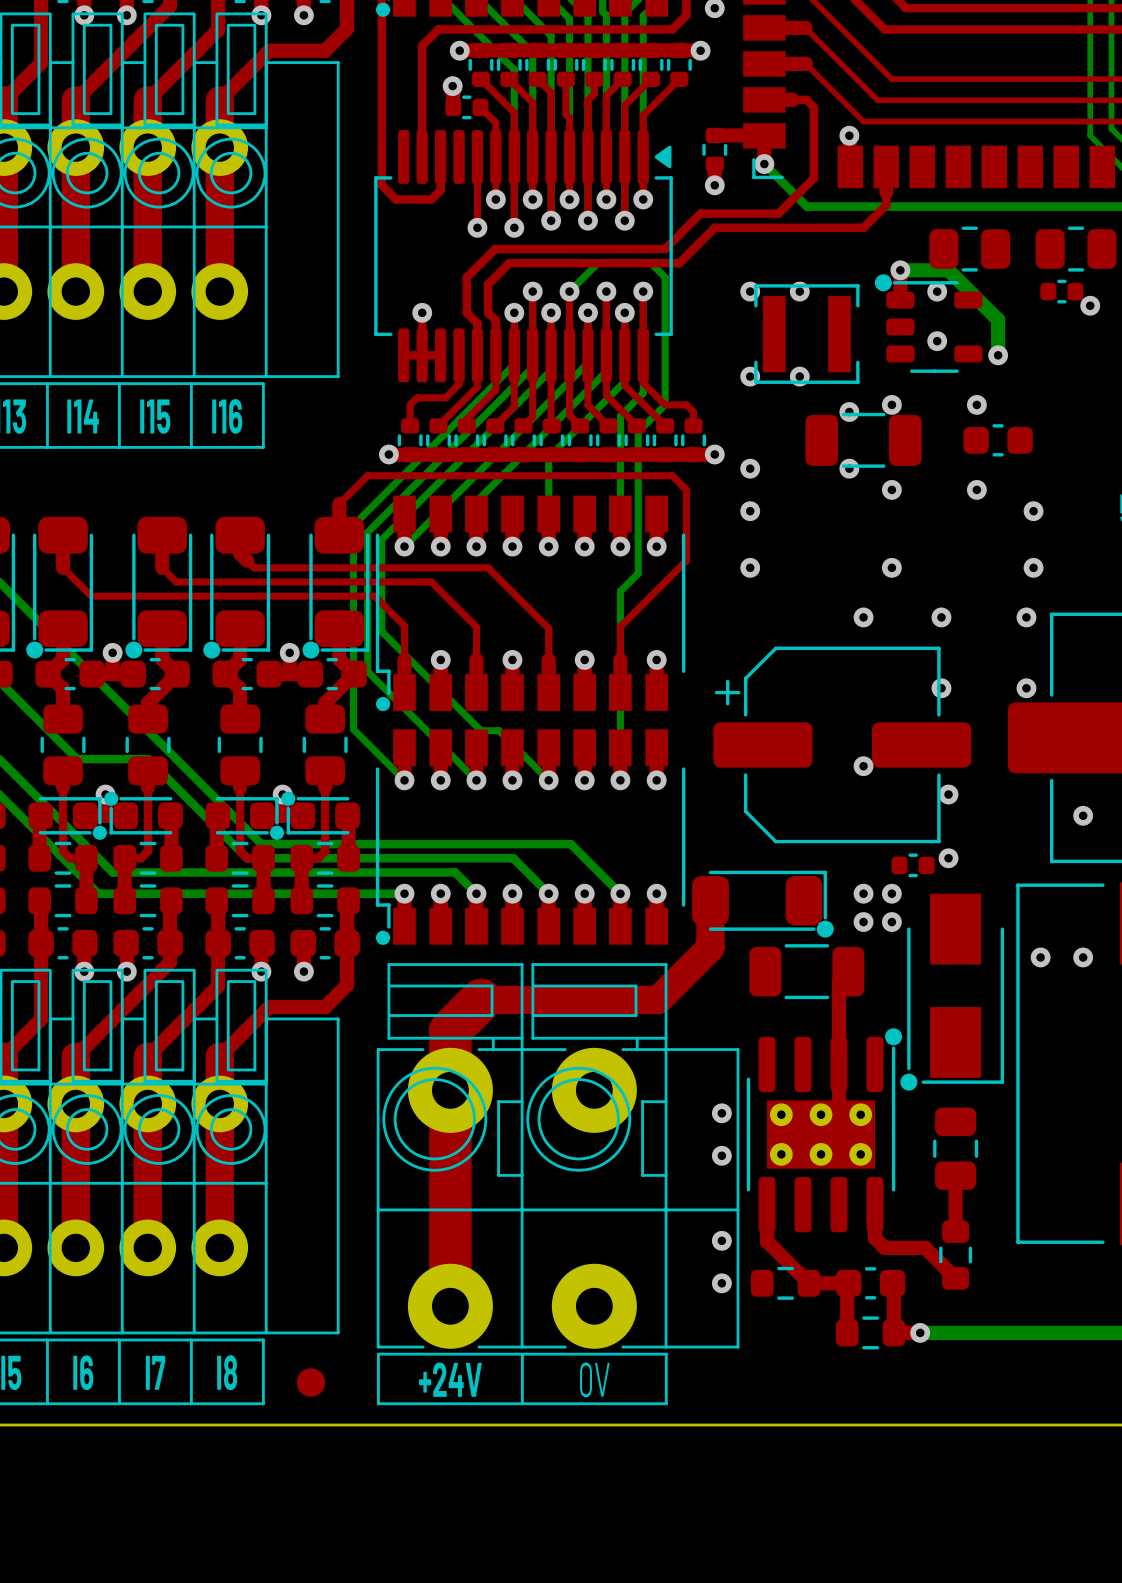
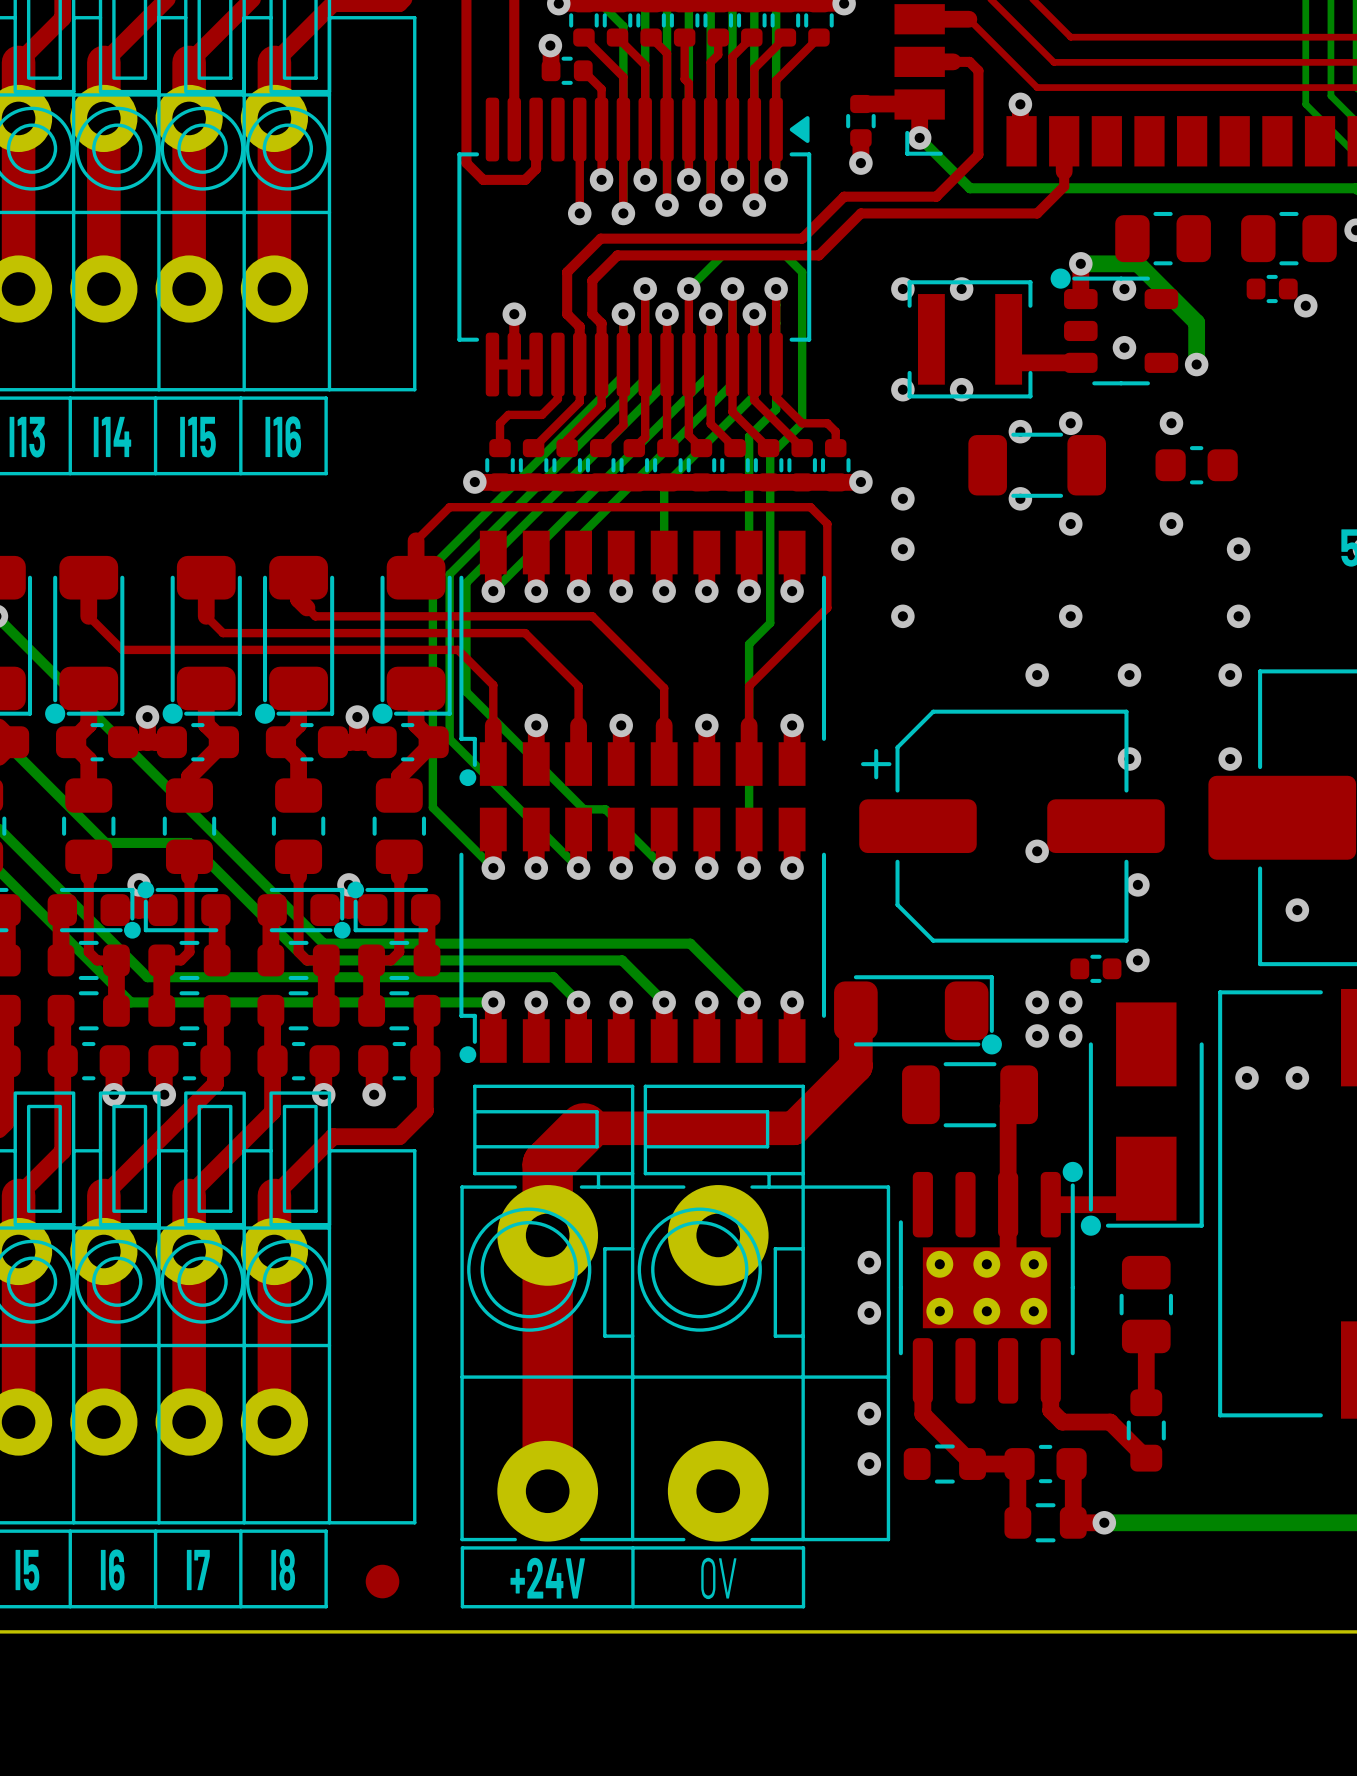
top track: none -> (1008, 362) (1080, 362)
top track: none -> (1146, 1178) (1120, 1204) (1050, 1204)

